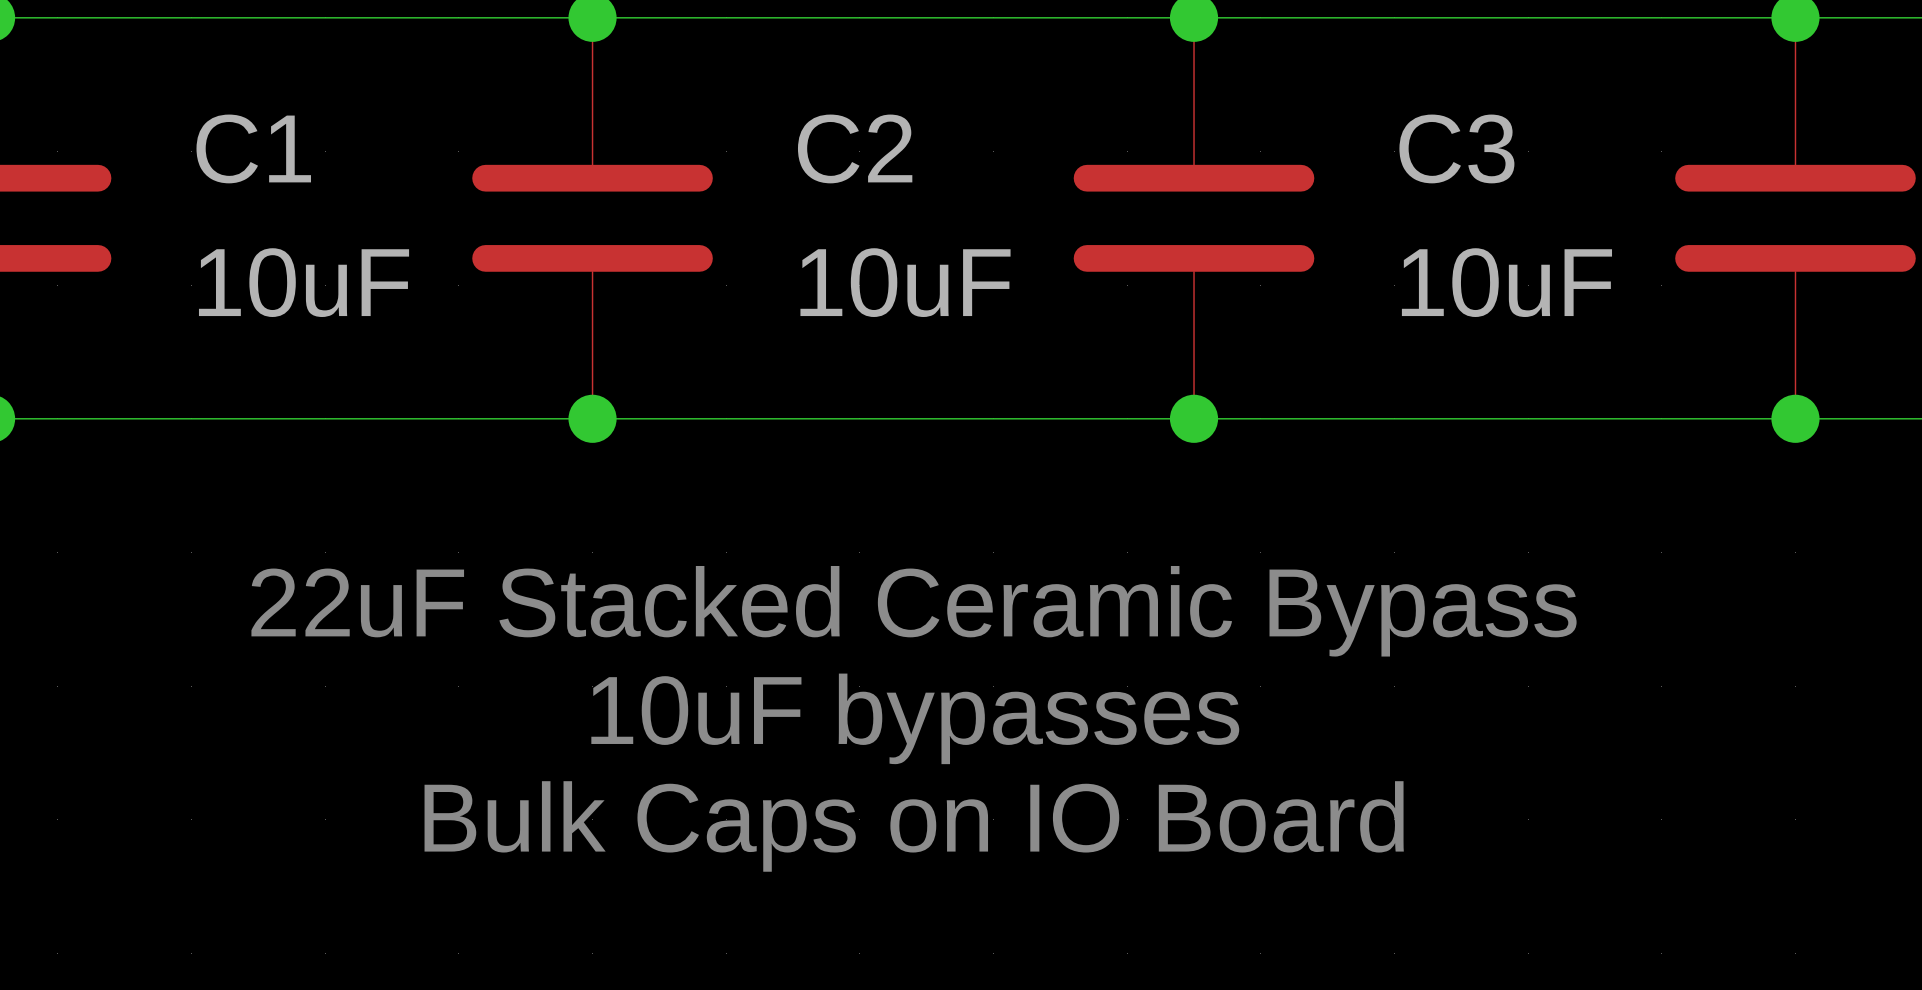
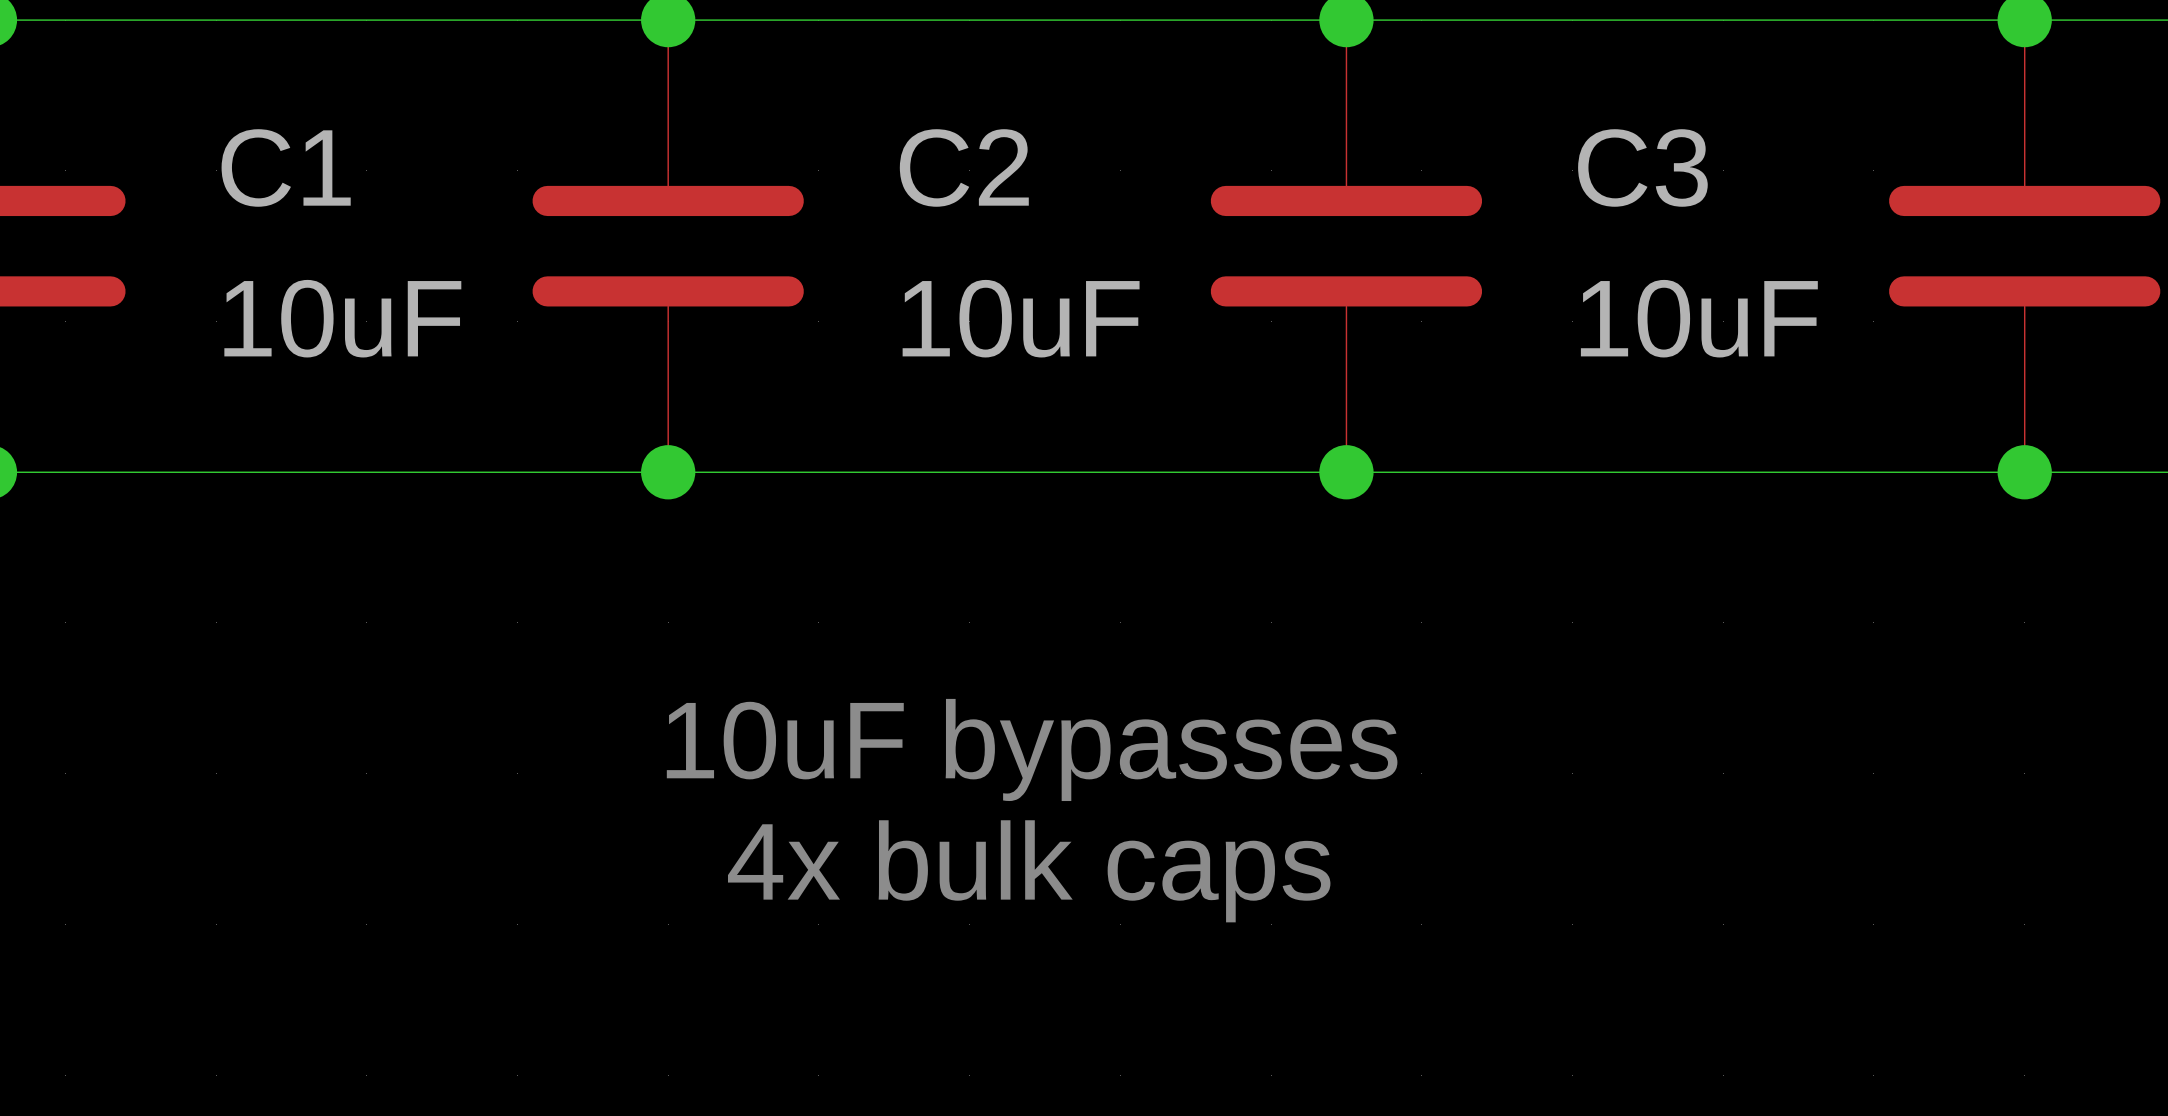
text: 22uF Stacked Ceramic Bypass (914, 611) -> none
text position: 10uF bypasses (915, 718) -> 10uF bypasses (1032, 749)
text: none -> 4x bulk caps (1029, 871)
text: Bulk Caps on IO Board (914, 826) -> none

